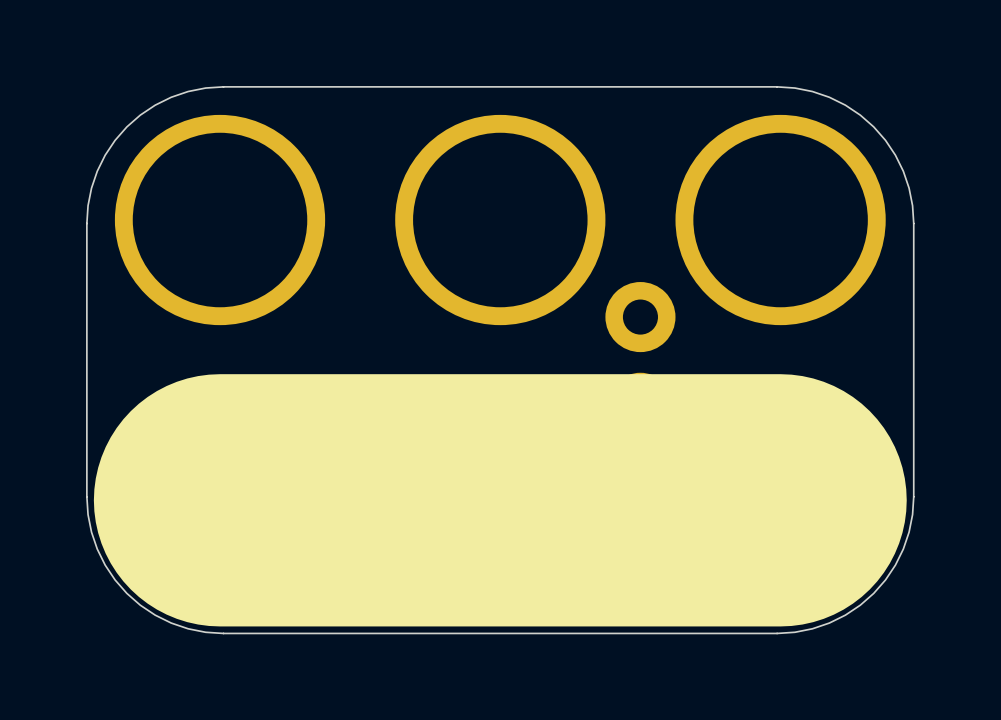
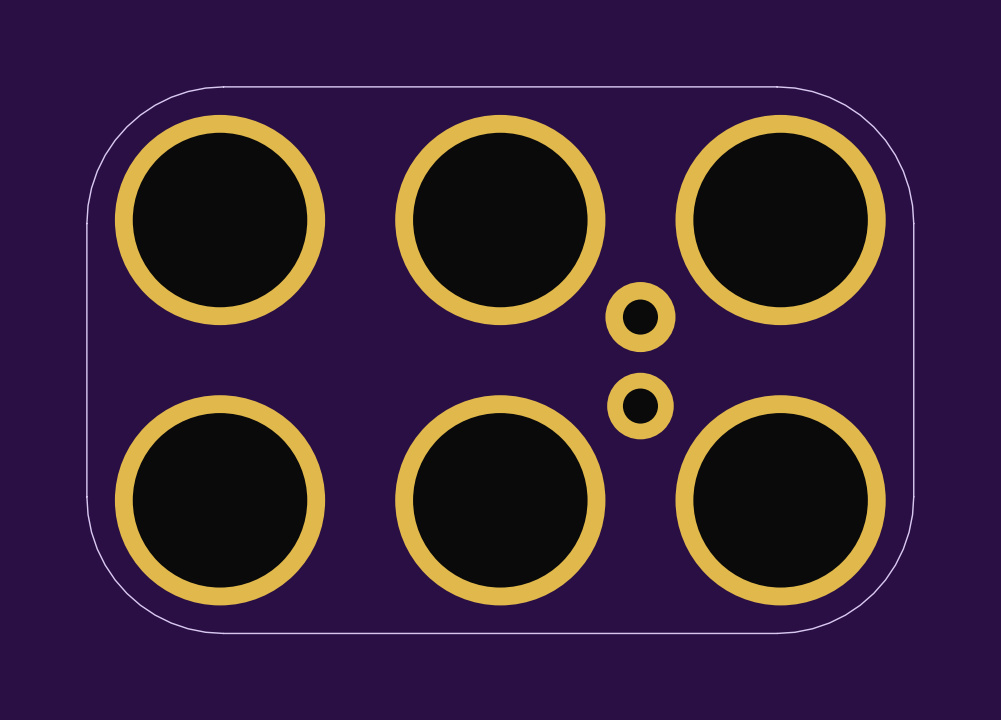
part footprint: [86, 86, 915, 635] -> [86, 86, 915, 635]

